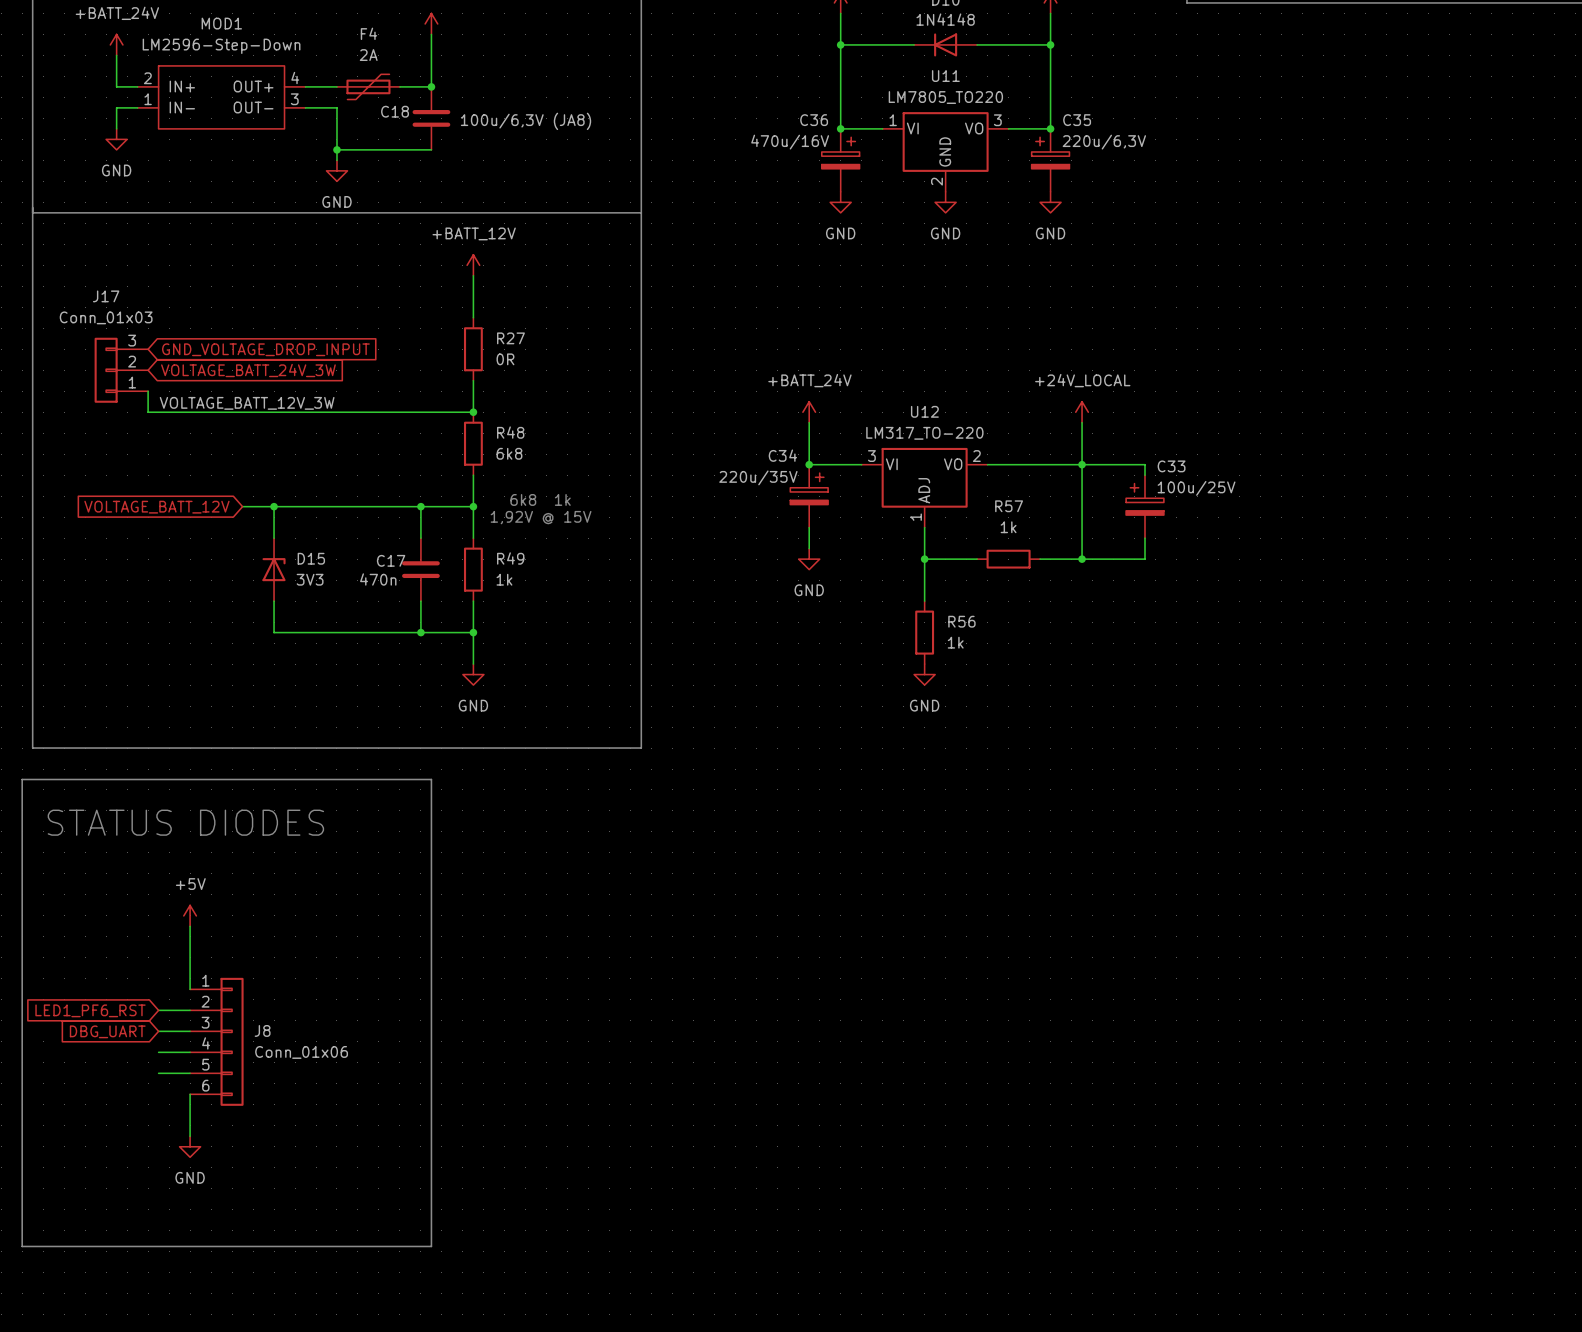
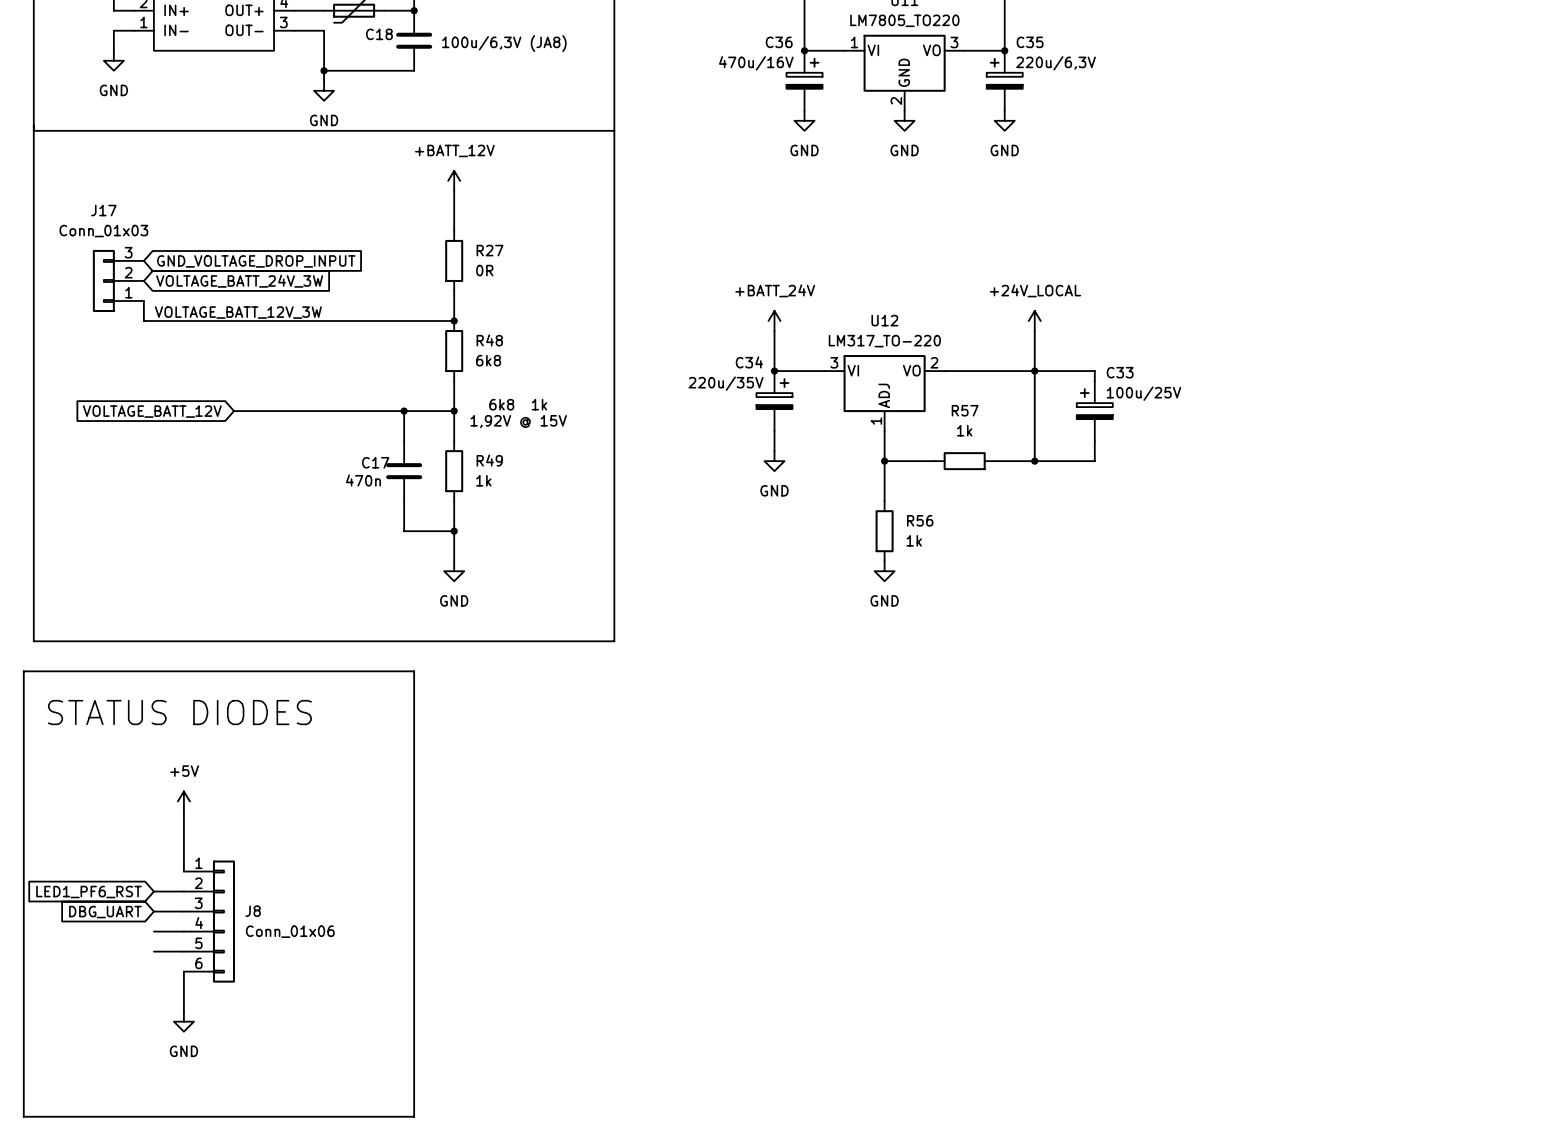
wire: (274, 506) (274, 538) -> none
junction: (274, 506) -> none
D15: 3V3 (274, 569) -> none
wire: (274, 601) (274, 632) (420, 632) -> none
junction: (420, 632) -> none

